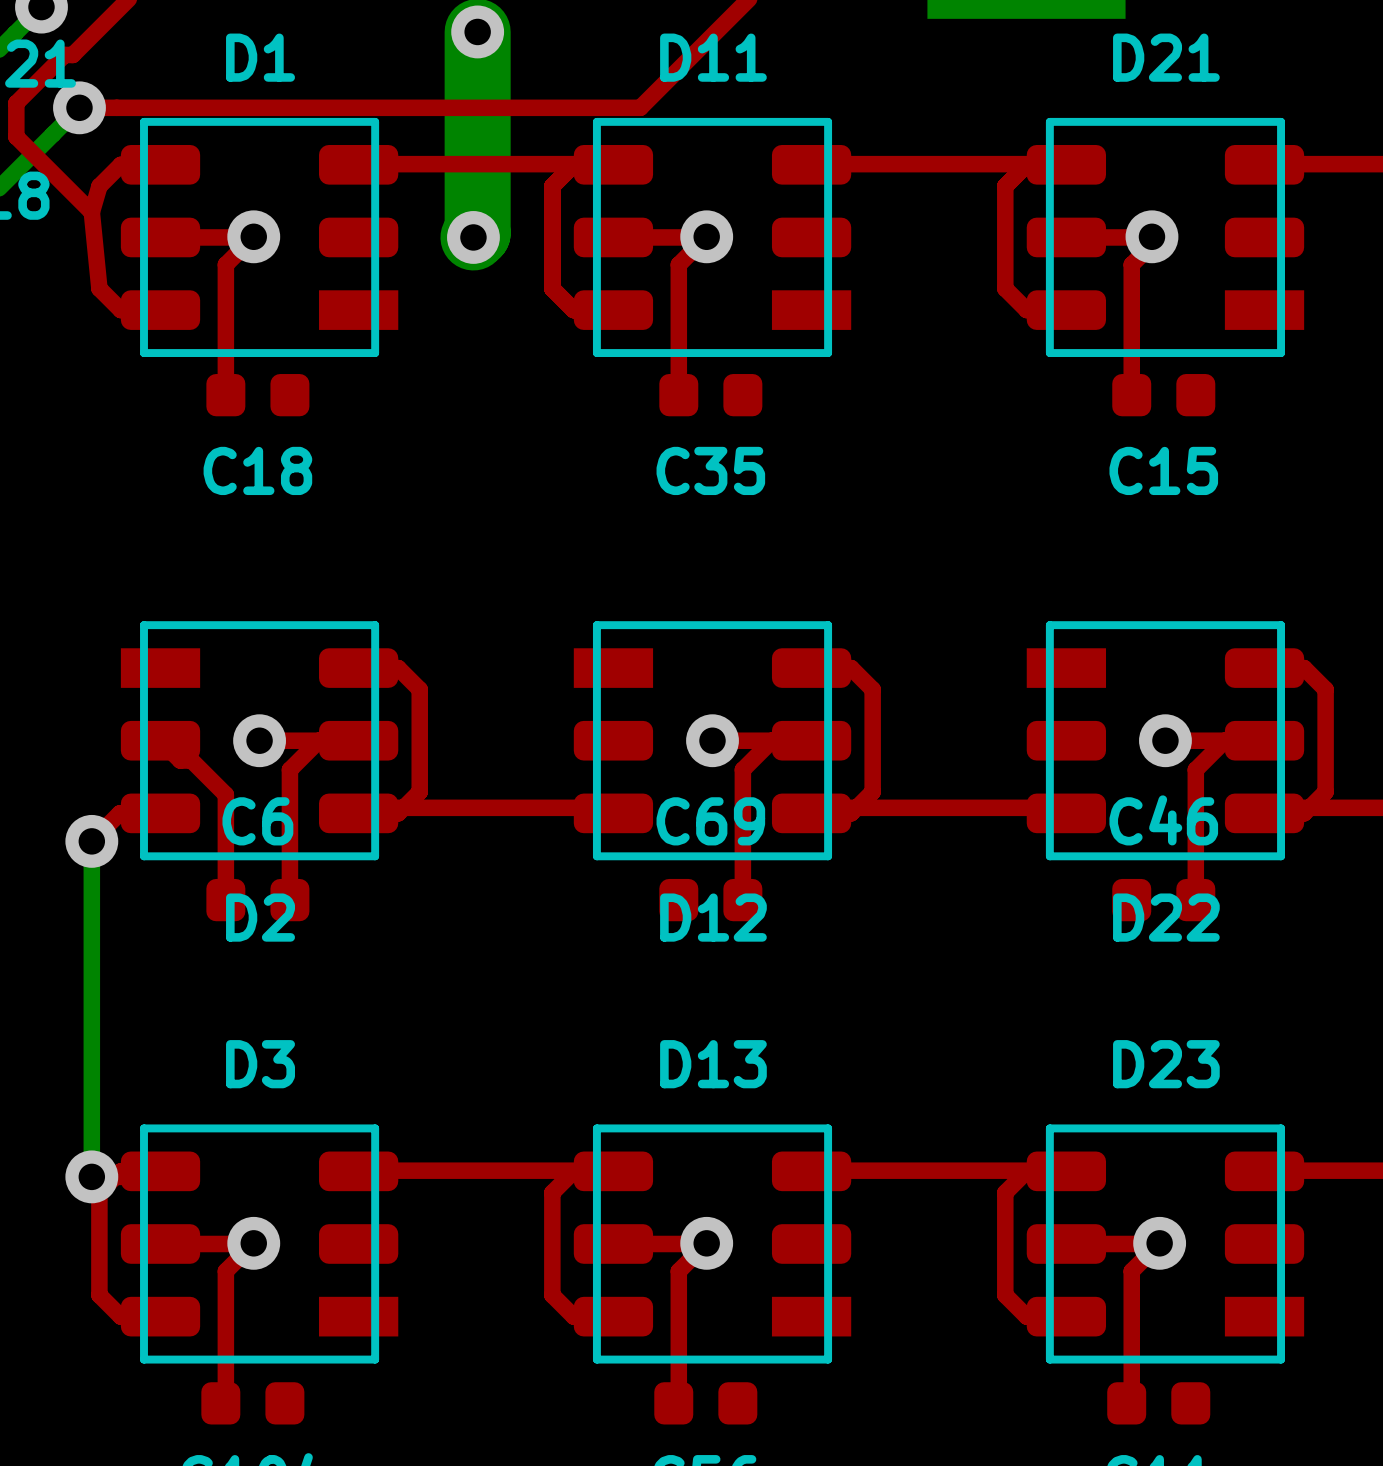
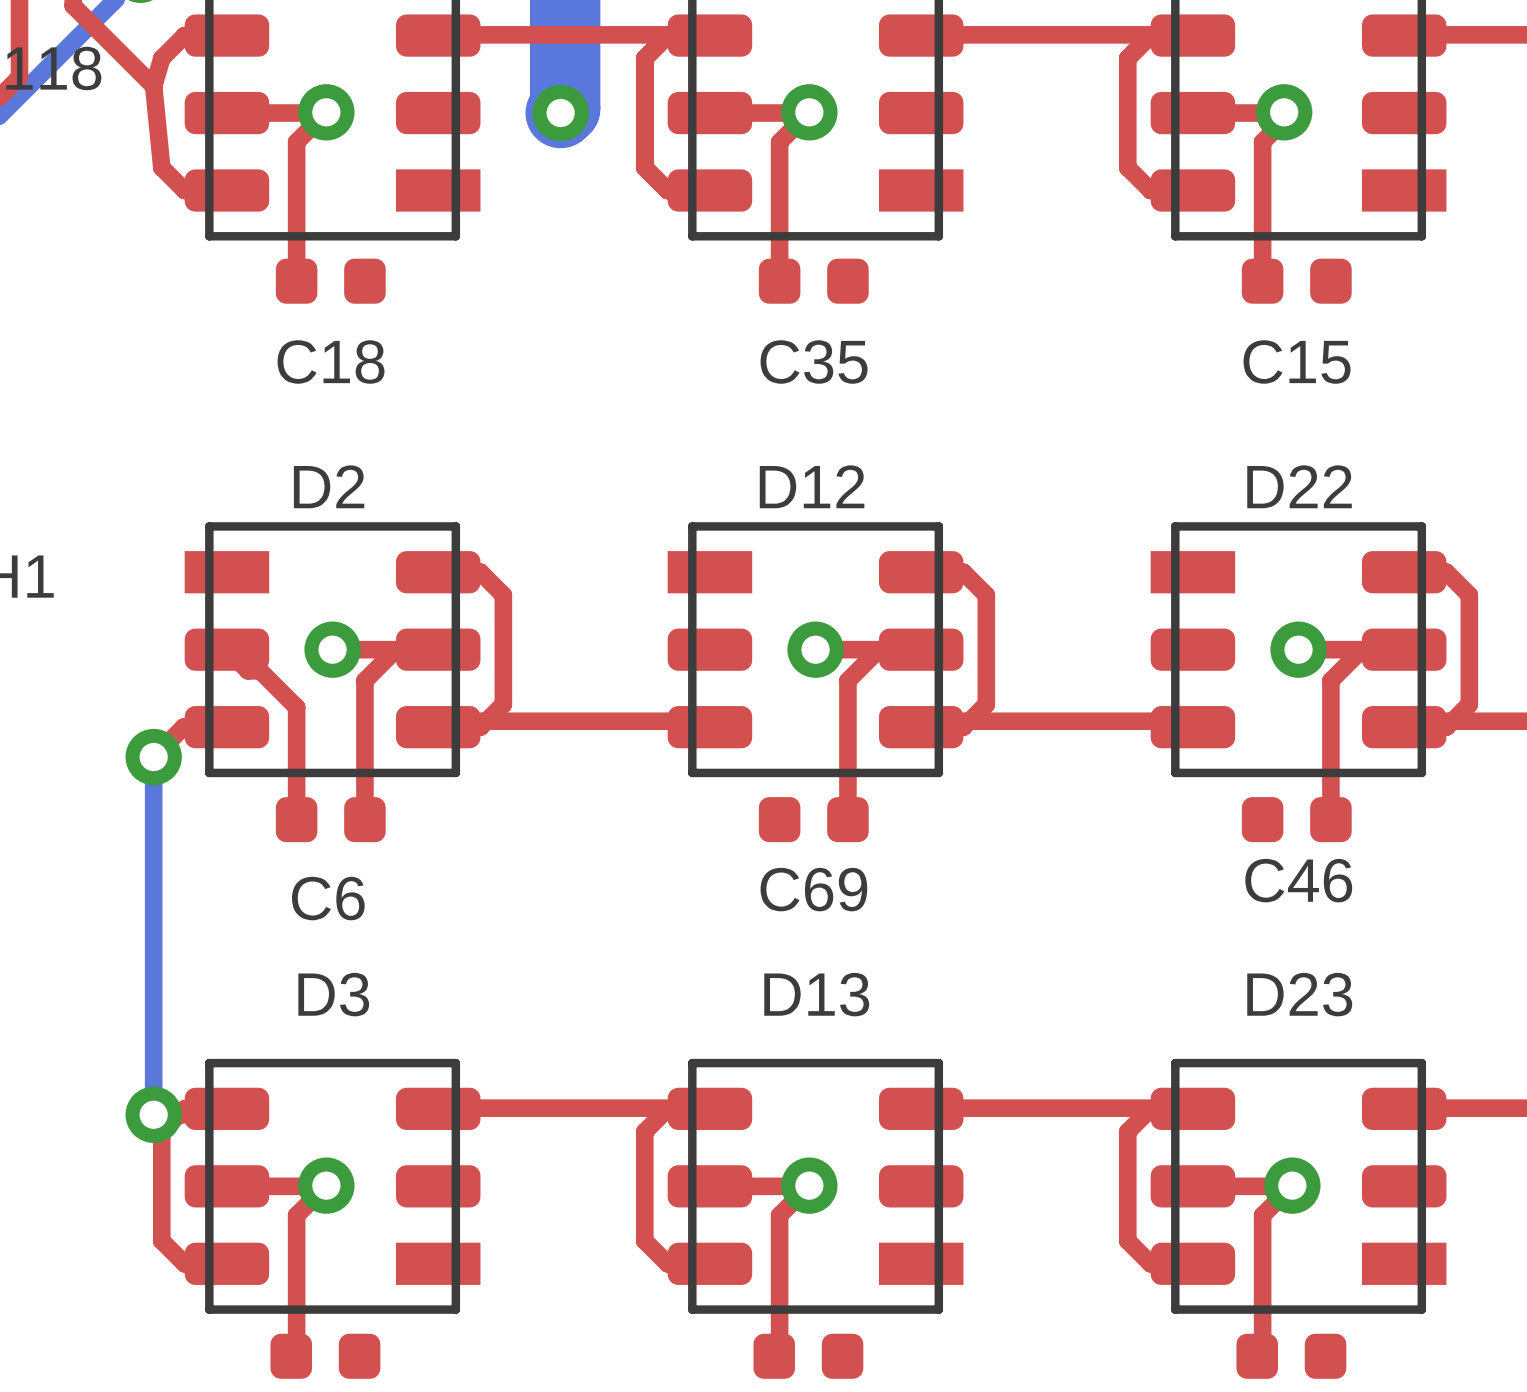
C46 name position: C46 (1163, 820) -> C46 (1298, 880)
C6 name position: C6 (257, 821) -> C6 (328, 898)
C69 name position: C69 (710, 821) -> C69 (813, 889)
D2 name position: D2 (260, 917) -> D2 (329, 486)
D12 name position: D12 (713, 917) -> D12 (812, 486)
D22 name position: D22 (1166, 917) -> D22 (1299, 486)

